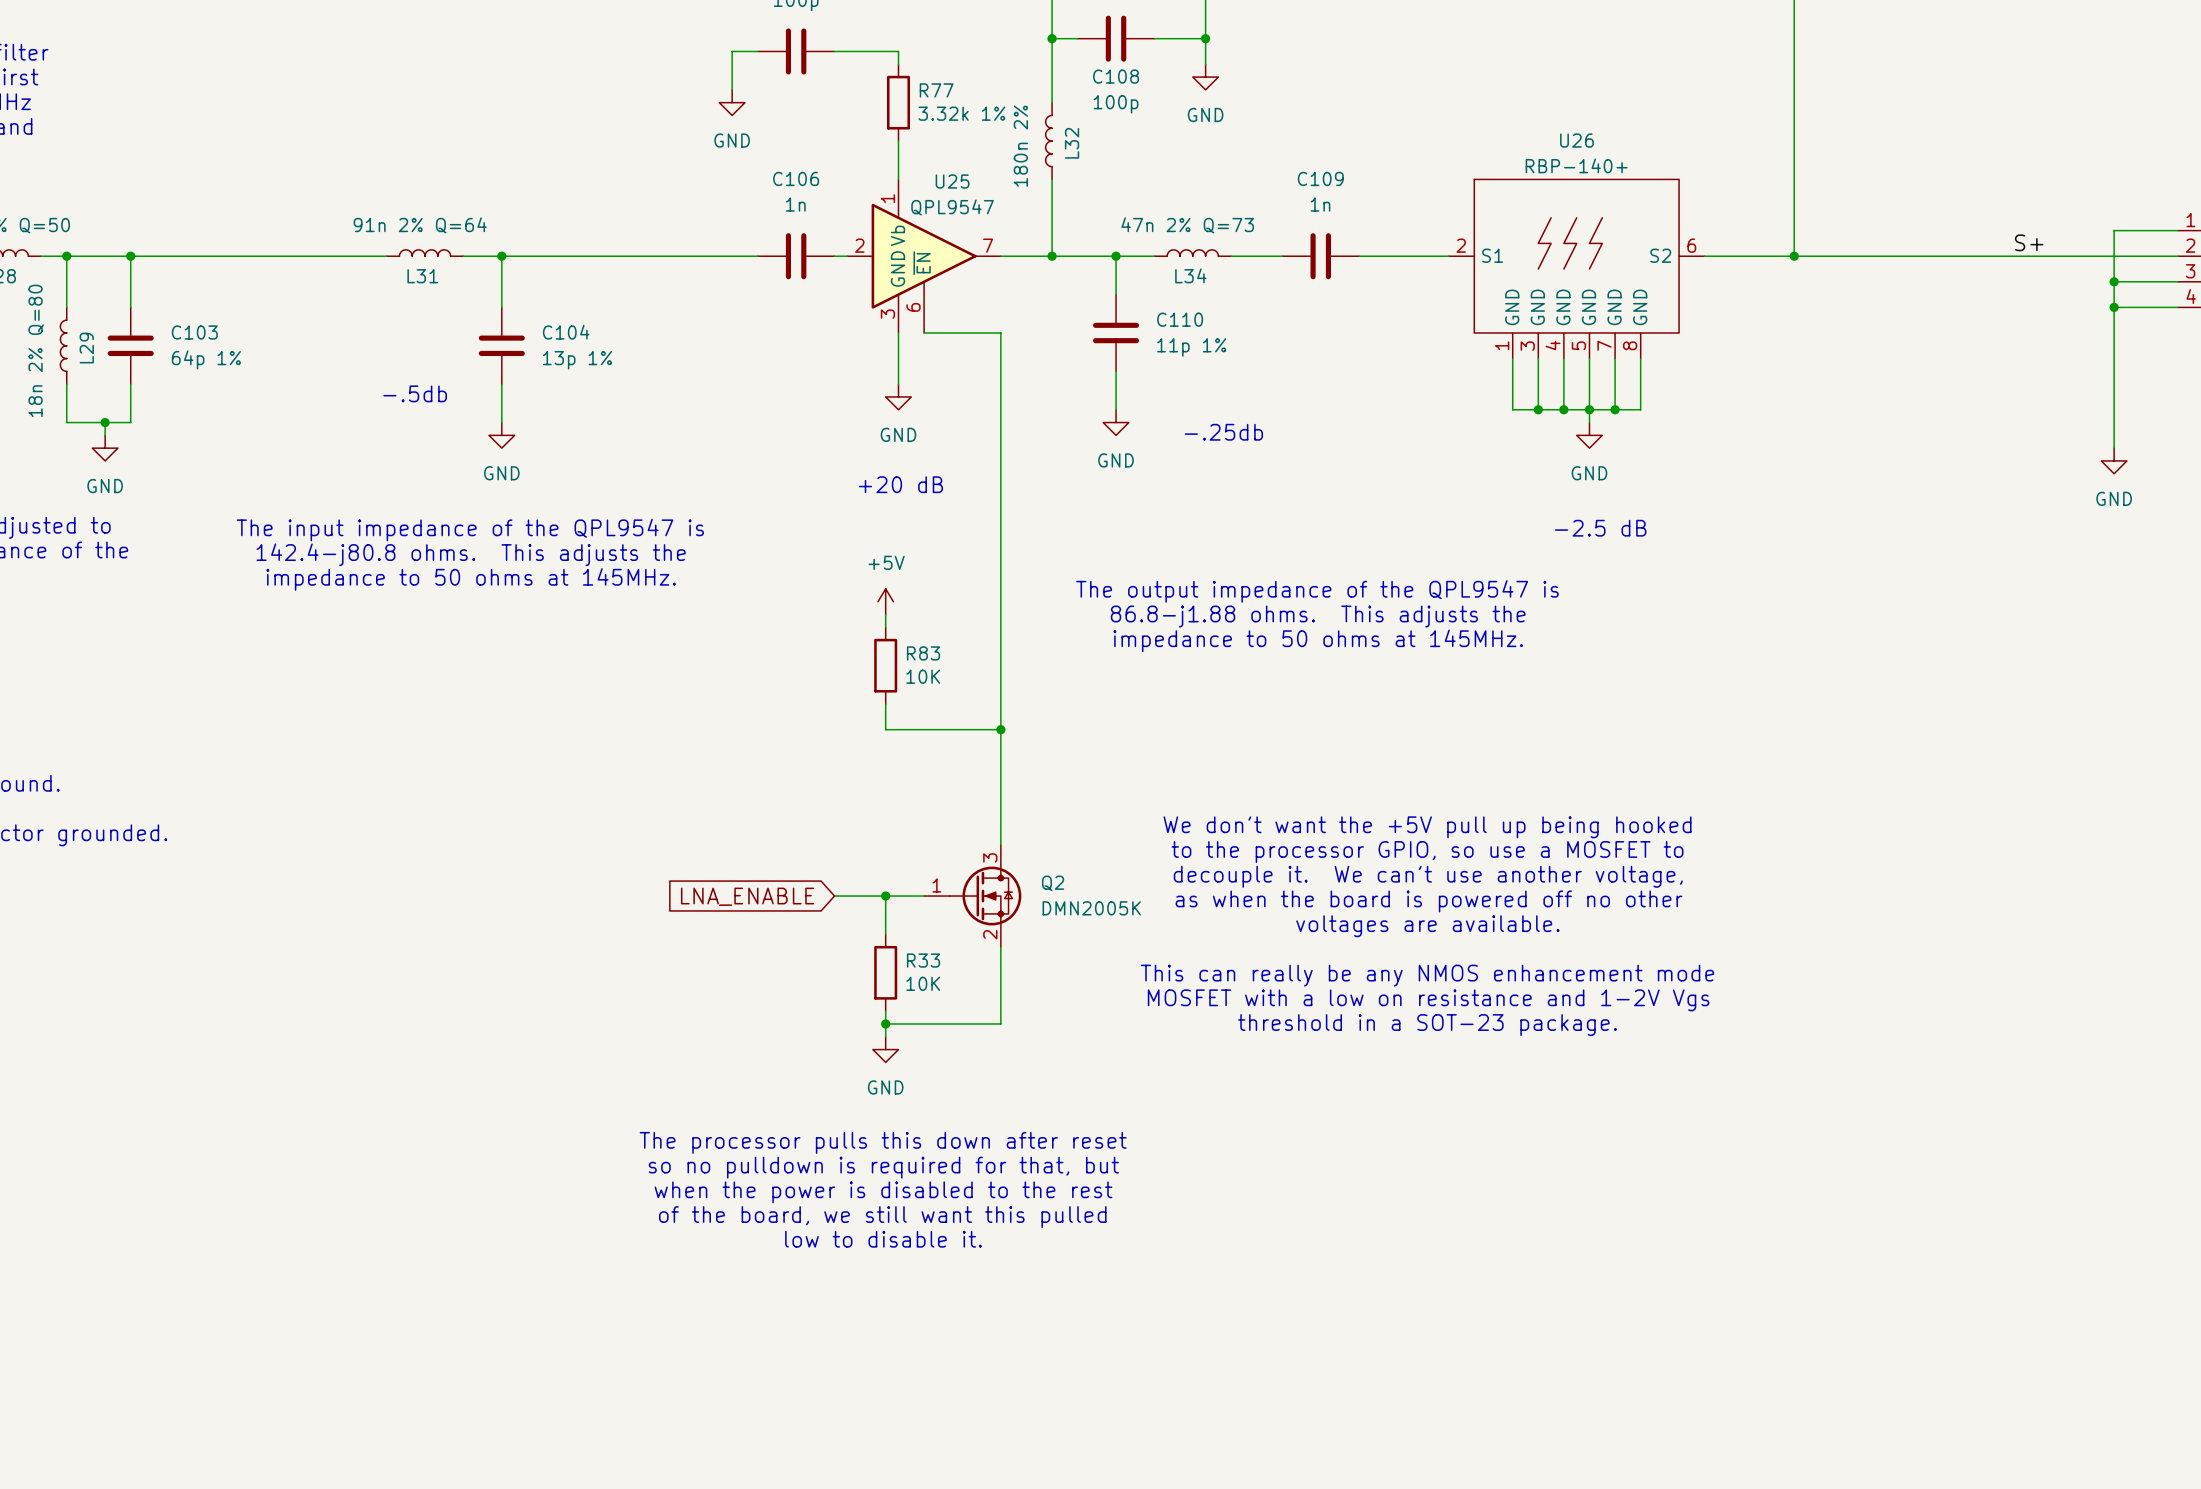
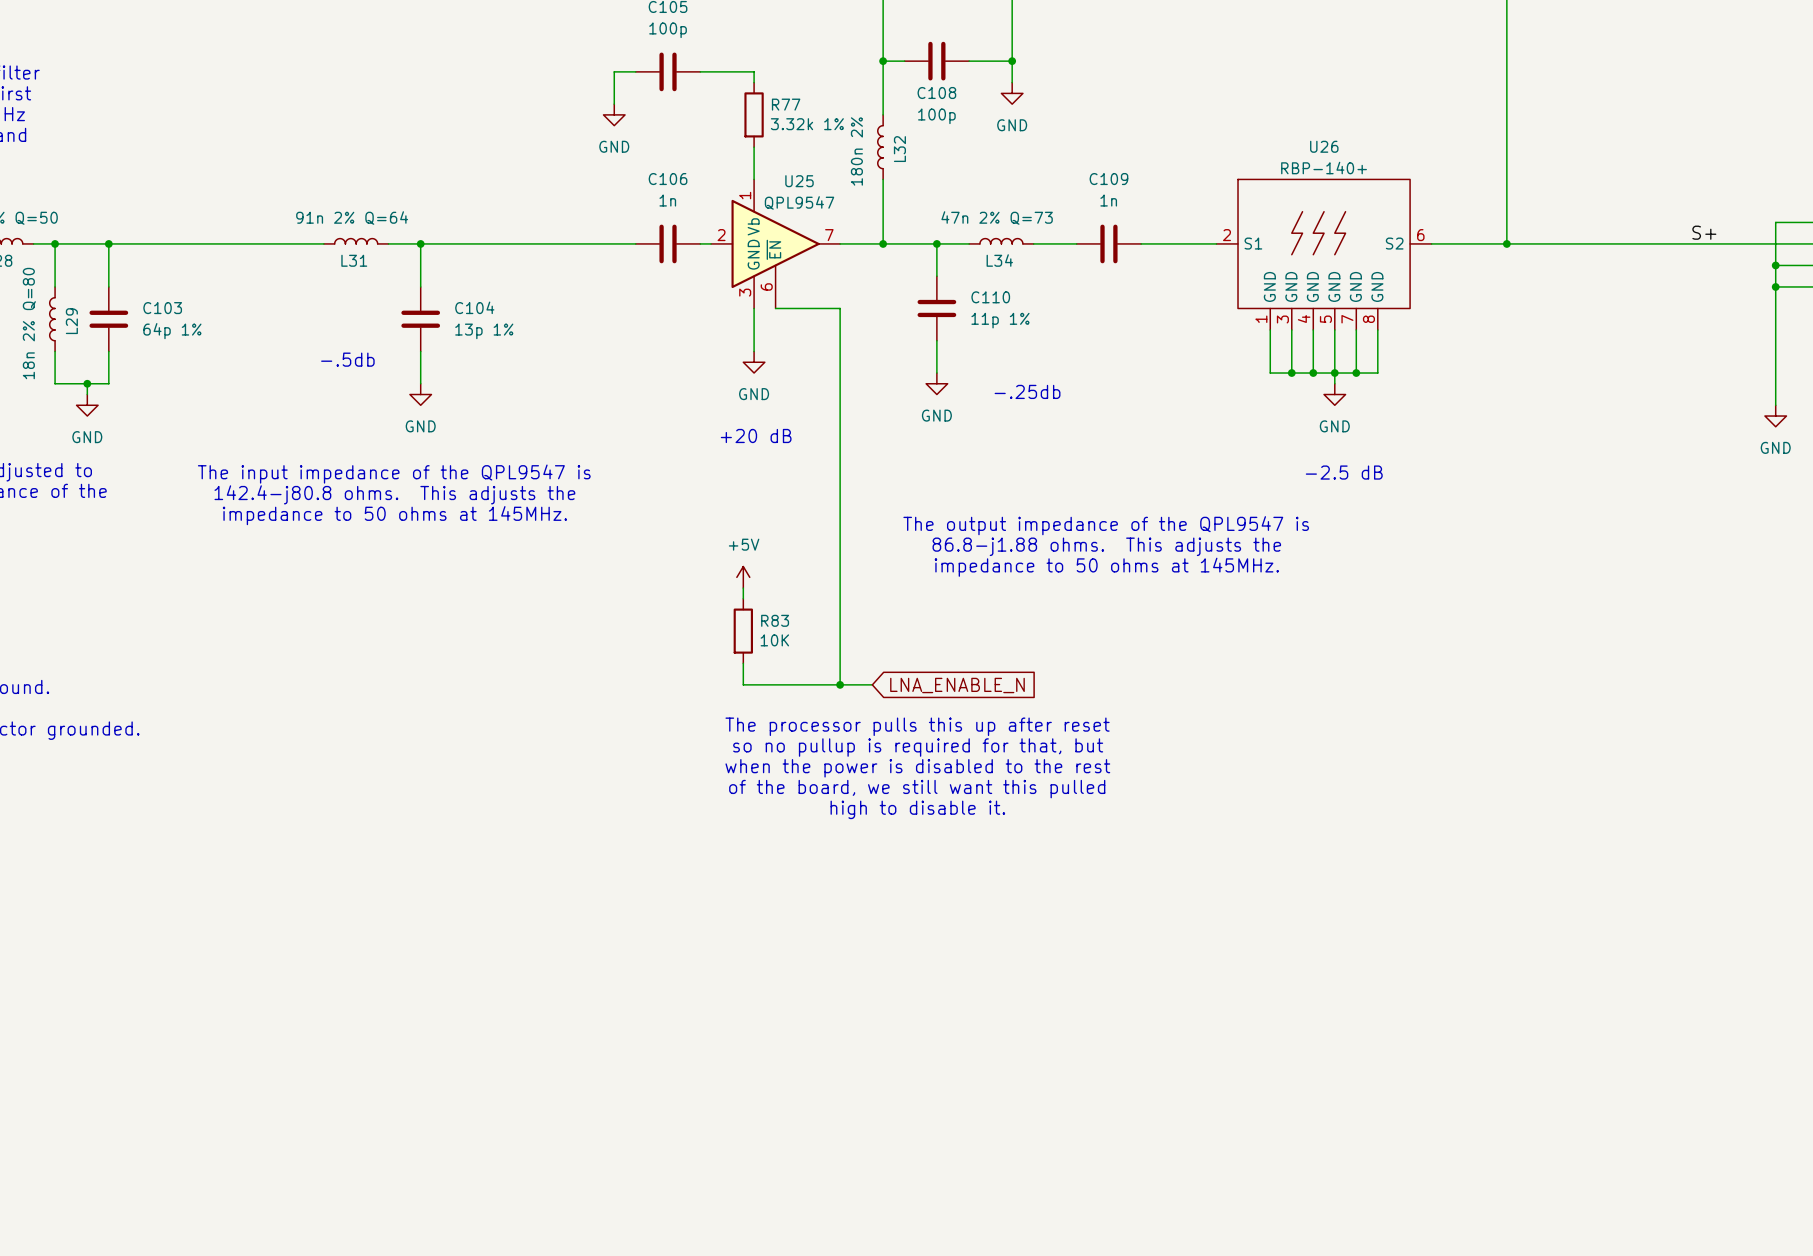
power symbol position: +5V (885, 601) -> +5V (743, 577)
wire: (885, 614) (885, 627) -> (743, 588) (743, 598)
R83 position: (885, 665) -> (743, 631)
wire: (885, 704) (885, 729) (1000, 729) -> none
junction position: (1000, 729) -> (840, 684)
wire: none -> (743, 663) (743, 684) (872, 684)
wire: (1000, 780) (1000, 844) -> none
global label: none -> LNA_ENABLE_N (957, 685)
text: We don't want the +5V pull up being hooked (1427, 827) -> none
text: none -> The processor pulls this up after reset (917, 726)
text: to the processor GPIO, so use a MOSFET to (1427, 852) -> none
text: none -> so no pullup is required for that, but (918, 747)
text: decouple it. We can't use another voltage, (1428, 876) -> none
text: none -> when the power is disabled to the rest (917, 768)
global label: LNA_ENABLE (747, 896) -> none
wire: (834, 896) (924, 896) -> none
wire: (885, 896) (885, 934) -> none
junction: (885, 896) -> none
Q2: DMN2005K (972, 896) -> none
text: as when the board is powered off no other (1428, 901) -> none
text: none -> of the board, we still want this pulled (917, 789)
text: voltages are available. (1427, 926) -> none
text: none -> high to disable it. (917, 809)
wire: (1000, 947) (1000, 1023) (885, 1023) -> none
R33: 10K (885, 972) -> none
text: This can really be any NMOS enhancement mode (1427, 975) -> none
text: MOSFET with a low on resistance and 1-2V Vgs (1428, 1000) -> none
wire: (885, 1011) (885, 1036) -> none
junction: (885, 1023) -> none
text: threshold in a SOT-23 package. (1427, 1025) -> none
power symbol: GND (885, 1049) -> none
text: The processor pulls this down after reset (883, 1142) -> none
text: so no pulldown is required for that, but (883, 1167) -> none
text: when the power is disabled to the rest (883, 1192) -> none
text: of the board, we still want this pulled (882, 1217) -> none
text: low to disable it. (883, 1239) -> none

